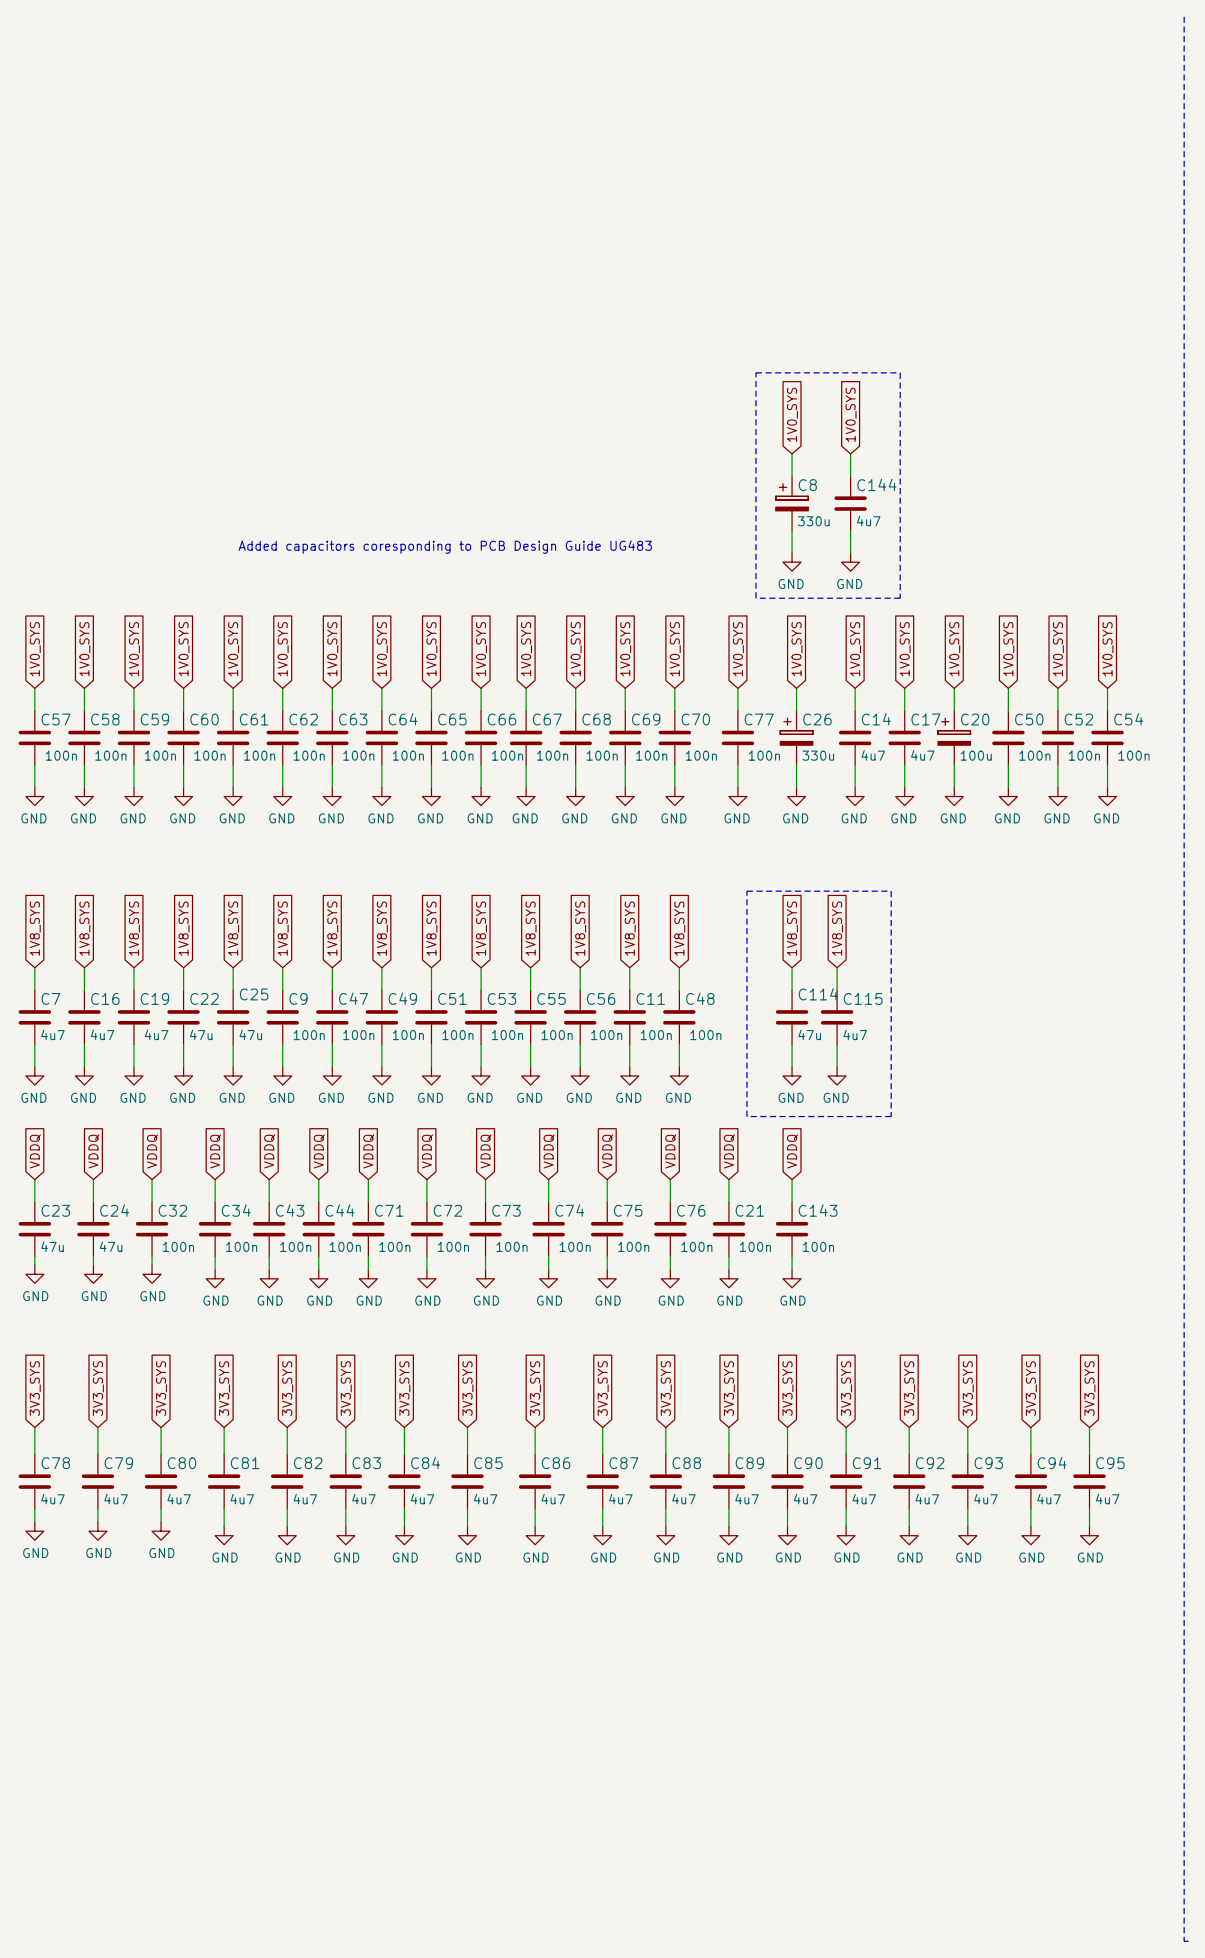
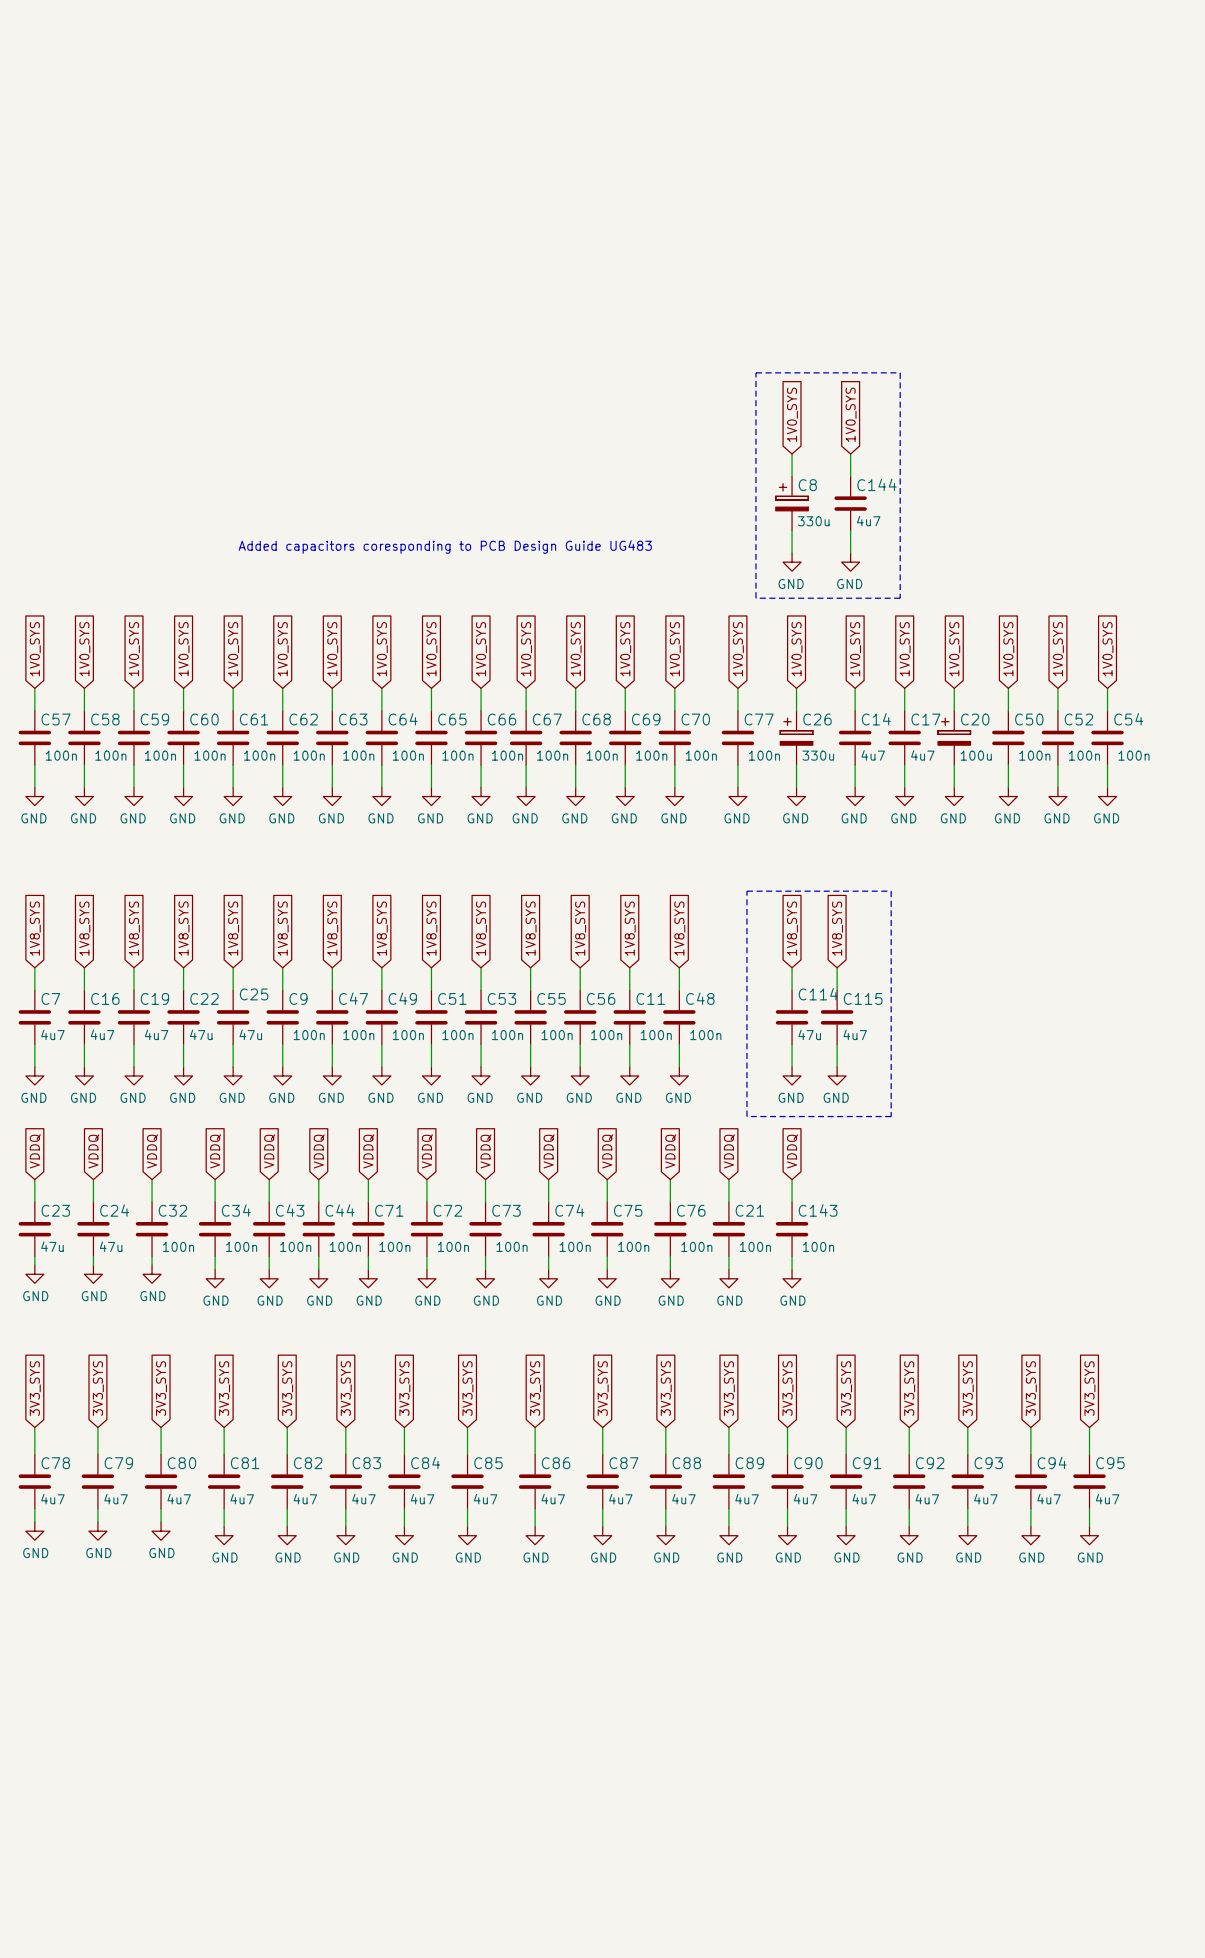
line: (1184, 16) (1184, 1941) (1188, 1941) -> none

